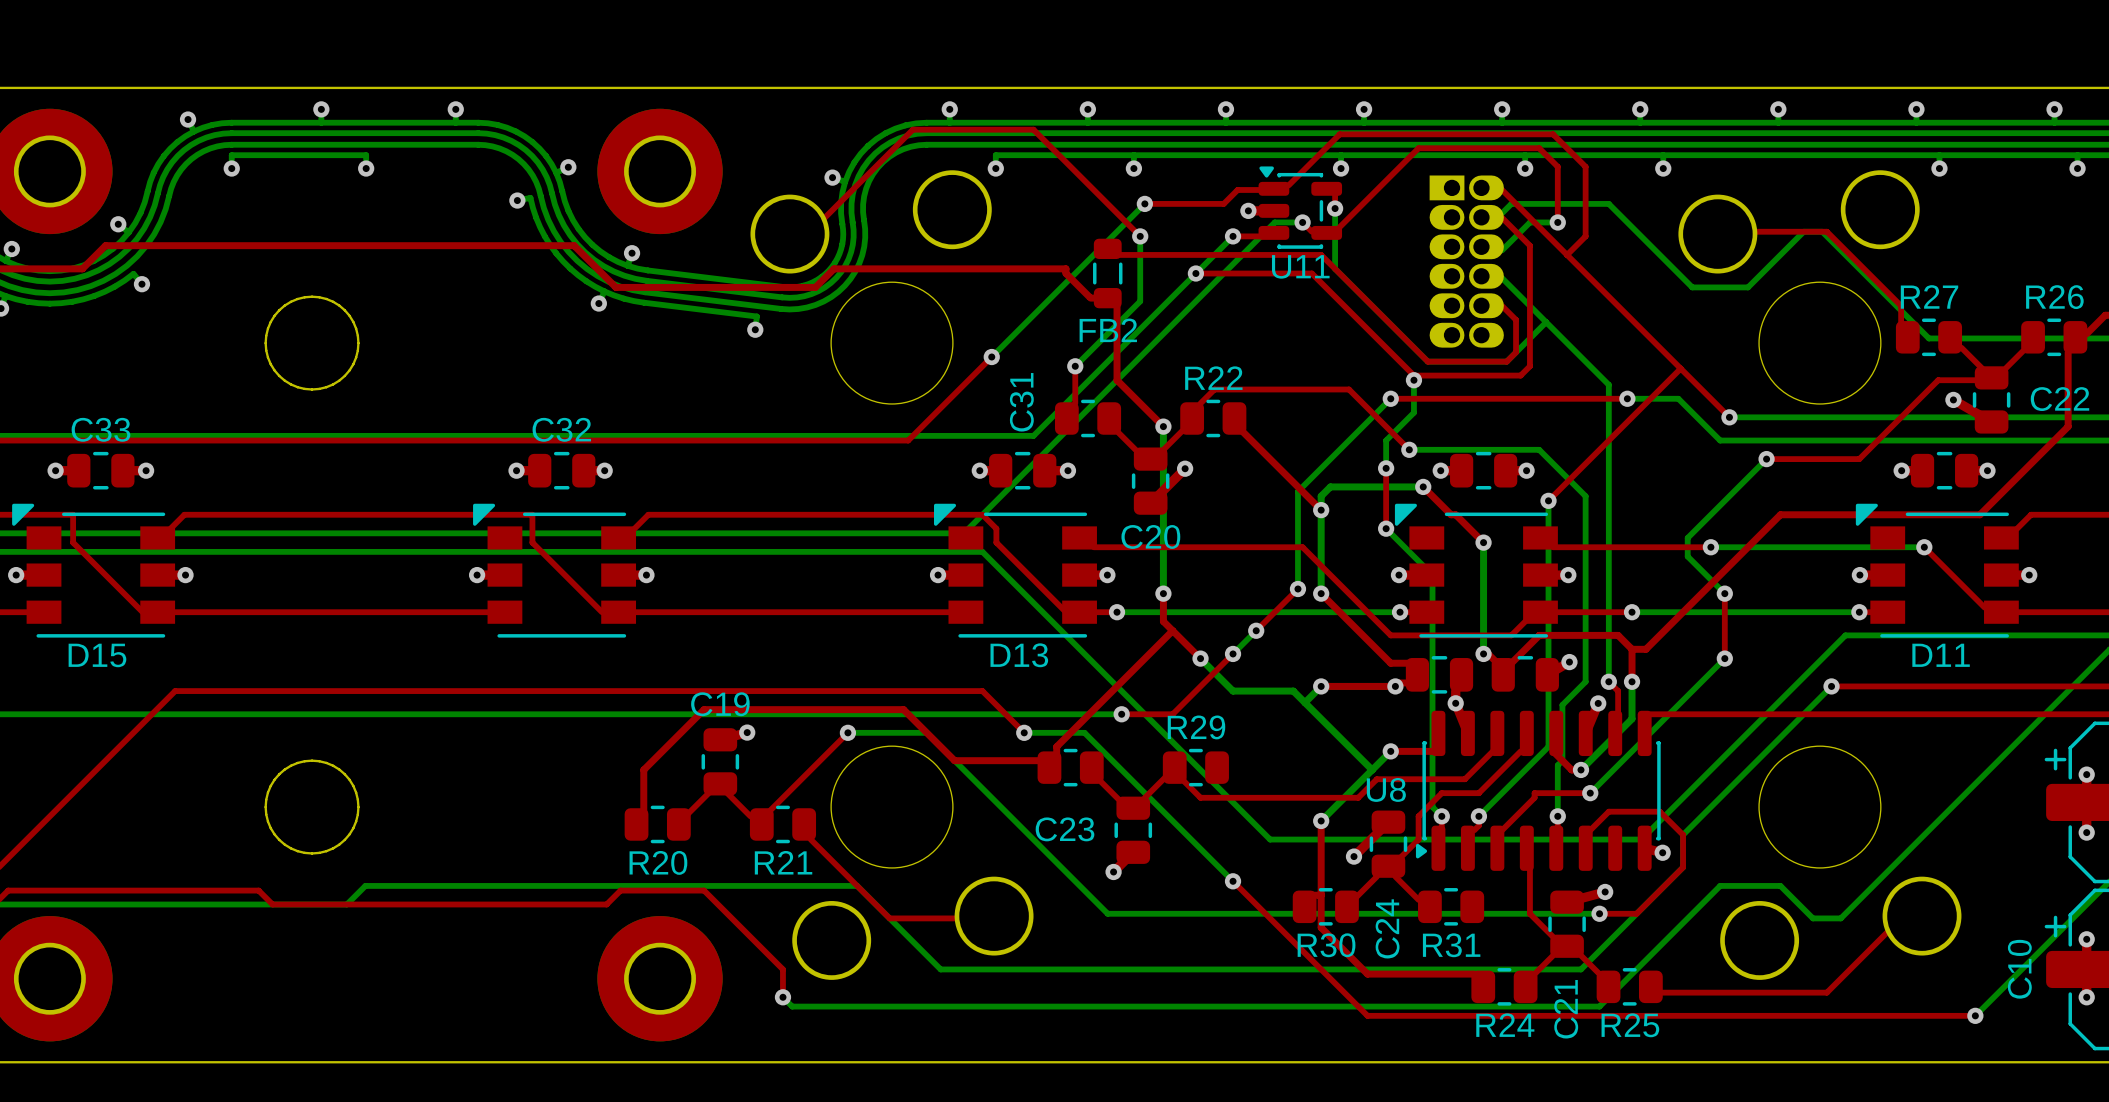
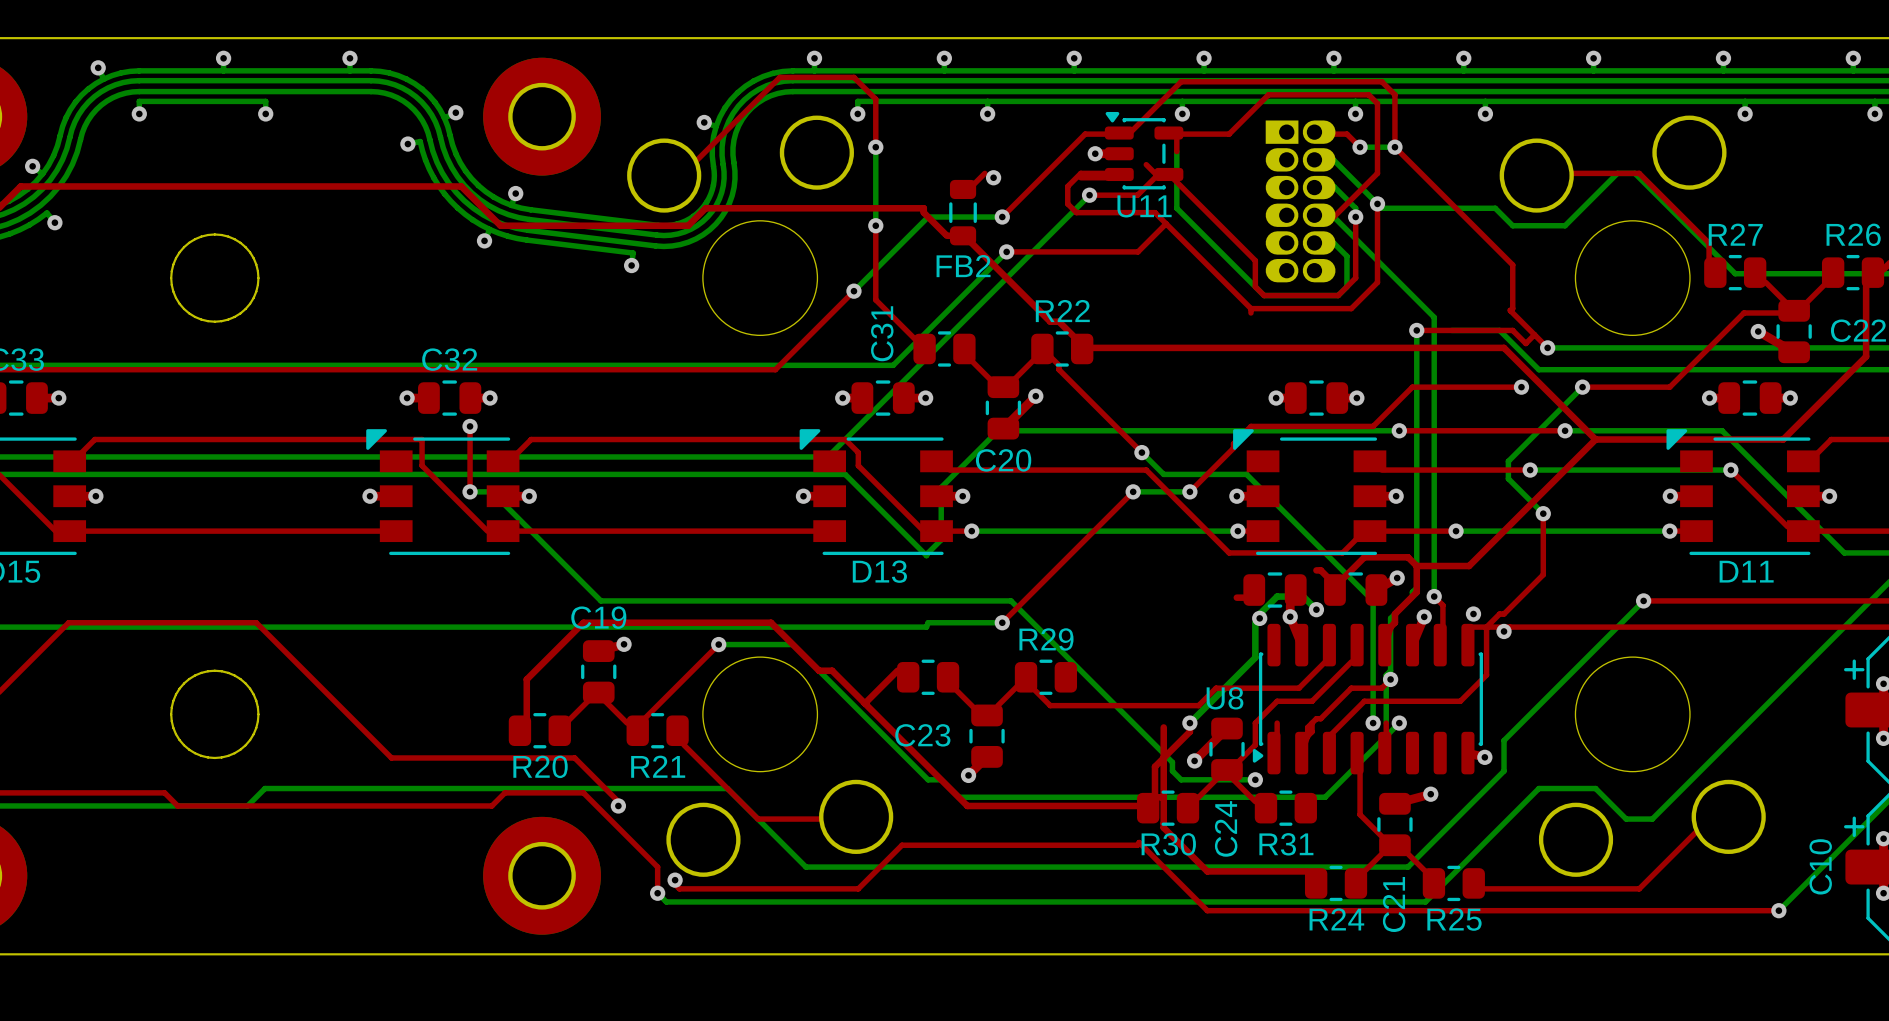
top track: (991, 129) (1033, 129) (1140, 236) -> (853, 77) (875, 99) (875, 147)
top track: (1432, 148) (1418, 148) (1339, 227) -> (1268, 94) (1229, 134) (1168, 133)
top track: (1567, 148) (1585, 166) (1585, 236) (1567, 254) -> (1394, 94) (1394, 147)
top track: (1548, 157) (1557, 166) (1557, 222) -> (1377, 103) (1377, 173) (1333, 217) (1314, 215)
top track: none -> (1314, 132) (1316, 134) (1346, 134) (1360, 147)
top track: (1502, 189) (1689, 377) -> (1399, 151) (1512, 265) (1512, 308) (1510, 310)
bottom track: none -> (875, 147) (875, 225)
via: none -> (875, 147)
top track: (1144, 203) (1223, 203) -> (1002, 217) (1072, 147)
bottom track: (1144, 203) (1070, 278) -> (1002, 217) (928, 217)
via: (1144, 203) -> none
bottom track: (1529, 203) (1511, 203) (1502, 213) -> none
via: none -> (1360, 147)
bottom track: (1567, 203) (1608, 203) (1673, 268) -> (1381, 208) (1495, 208)
via: none -> (1394, 147)
via: (1335, 208) -> none
bottom track: none -> (1314, 159) (1333, 160) (1377, 203)
top track: (1502, 217) (1529, 245) (1529, 366) -> (1377, 203) (1377, 282) (1360, 299)
bottom track: (1302, 222) (1274, 222) (1242, 254) -> none
via: (1302, 222) -> none
bottom track: (1557, 222) (1529, 222) (1502, 250) -> none
via: (1557, 222) -> none
top track: none -> (984, 173) (971, 186) (963, 189)
top track: none -> (1168, 173) (1159, 173) (1137, 195)
bottom track: (1140, 236) (1140, 301) (1075, 366) -> none
bottom track: (1233, 236) (1200, 268) -> none
via position: (1233, 236) -> (1089, 195)
bottom track: none -> (1314, 187) (1333, 186) (1355, 208) (1355, 217)
top track: (1117, 254) (1242, 254) -> none
top track: (1293, 254) (1321, 254) (1418, 352) -> (1168, 173) (1255, 260) (1255, 286)
via: none -> (1377, 203)
top track: (1195, 273) (1228, 273) -> (1119, 174) (1080, 173) (1067, 186) (1067, 203) (1076, 212)
bottom track: (1195, 273) (1154, 315) -> none
via: (1195, 273) -> none
via: none -> (1002, 217)
via: none -> (1355, 217)
top track: none -> (1166, 223) (1137, 251) (1006, 251)
top track: none -> (875, 225) (875, 299) (924, 348)
via: none -> (875, 225)
top track: none -> (963, 235) (1050, 321) (1059, 321) (1076, 339) (1082, 348) (1080, 347) (1504, 347) (1595, 439)
top track: (1117, 305) (1117, 380) (1163, 426) -> none
top track: (1502, 305) (1516, 319) (1516, 352) -> (1355, 217) (1355, 278) (1346, 286)
via: none -> (1006, 251)
bottom track: (1546, 322) (1516, 352) -> (1314, 242) (1333, 243) (1346, 256) (1346, 286)
top track: (1075, 366) (1075, 403) -> none
via: (1075, 366) -> none
top track: (1680, 368) (1548, 500) -> none
bottom track: (1413, 380) (1413, 412) (1386, 440) (1386, 468) -> none
via: (1413, 380) -> none
top track: (1390, 398) (1590, 398) -> none
bottom track: (1390, 398) (1297, 491) (1297, 589) -> none
via: (1390, 398) -> none
top track: none -> (1451, 330) (1512, 330) (1525, 343) (1534, 334)
via position: (1627, 398) -> (1416, 330)
top track: (1200, 403) (1214, 389) (1349, 389) (1409, 449) -> none
top track: none -> (1042, 348) (1059, 365) (1059, 369) (1141, 452)
bottom track: (1163, 426) (1163, 593) -> none
via: (1163, 426) -> none
top track: (1242, 431) (1321, 510) -> none
bottom track: (1409, 449) (1539, 449) (1585, 496) (1585, 677) -> (1416, 330) (1416, 587) (1412, 592)
via: (1409, 449) -> none
top track: none -> (1521, 387) (1412, 387) (1373, 426) (1250, 426) (1233, 443) (1233, 448) (1189, 491)
via: none -> (1521, 387)
top track: (1386, 468) (1386, 528) -> none
via: (1386, 468) -> none
top track: (1423, 486) (1451, 514) (1455, 514) (1483, 542) -> none
bottom track: (1423, 486) (1330, 486) (1321, 496) (1321, 593) -> none
via: (1423, 486) -> none
top track: none -> (470, 426) (470, 491)
via: none -> (470, 426)
bottom track: (1548, 500) (1548, 746) (1478, 816) -> none
via position: (1548, 500) -> (1399, 430)
top track: none -> (1399, 430) (1565, 430)
bottom track: none -> (1565, 430) (1722, 430) (1844, 552)
via: none -> (1565, 430)
via position: (1321, 510) -> (1141, 452)
bottom track: (1386, 528) (1409, 551) -> (1141, 452) (1163, 474) (1246, 474)
via: (1386, 528) -> none
bottom track: (1483, 542) (1483, 653) -> none
via: (1483, 542) -> none
bottom track: none -> (470, 491) (491, 491) (600, 600) (1011, 600) (1172, 762) (1172, 771) (1181, 779) (1255, 779)
via: none -> (470, 491)
top track: none -> (1133, 491) (1002, 622)
bottom track: none -> (1133, 491) (1189, 491)
via: none -> (1133, 491)
via: none -> (1189, 491)
bottom track: (1432, 575) (1432, 807) (1441, 816) -> (1268, 496) (1373, 600) (1373, 723)
top track: (1297, 589) (1256, 630) -> none
via: (1297, 589) -> none
top track: (1163, 593) (1163, 621) (1200, 658) -> none
via: (1163, 593) -> none
top track: (1321, 593) (1390, 663) (1409, 663) -> none
via: (1321, 593) -> none
top track: (1172, 630) (1056, 746) (1056, 756) -> none
bottom track: (1256, 630) (1233, 653) -> none
via: (1256, 630) -> none
bottom track: (2044, 635) (1845, 635) (1641, 839) (1270, 839) (1068, 638) -> (1399, 430) (997, 430) (941, 487) (941, 539) (926, 555)
top track: (1534, 640) (1539, 635) (1618, 635) (1632, 649) (1632, 681) -> (1364, 557) (1408, 557) (1416, 566)
top track: none -> (1416, 566) (1416, 592) (1394, 614) (1394, 622) (1390, 627) (1384, 645)
top track: (1233, 653) (1172, 714) (1121, 714) -> none
via: (1233, 653) -> none
via: (1483, 653) -> none
bottom track: (1200, 658) (1233, 691) (1293, 691) (1372, 769) -> none
via: (1200, 658) -> none
top track: none -> (1543, 574) (1504, 614) (1499, 614) (1486, 627) (1486, 675) (1460, 701) (1416, 701)
bottom track: (1724, 658) (1590, 793) -> none
via: (1724, 658) -> none
bottom track: (1632, 681) (1632, 718) (1580, 769) -> none
via position: (1632, 681) -> (1473, 614)
top track: (1321, 686) (1395, 686) -> none
via: (1321, 686) -> none
via: (1395, 686) -> none
bottom track: (1316, 691) (1304, 702) -> none
bottom track: none -> (1316, 609) (1303, 596) (1277, 596) (1259, 614) (1259, 618)
via: none -> (1316, 609)
via: none -> (1259, 618)
top track: (156, 709) (175, 691) (982, 691) (1024, 732) -> (68, 622) (256, 622) (391, 757) (574, 757) (618, 801) (618, 805)
bottom track: none -> (1255, 622) (1255, 657) (1189, 723)
bottom track: (1068, 714) (1121, 714) -> (926, 627) (928, 622) (1002, 622)
via position: (1121, 714) -> (1002, 622)
via: none -> (1504, 631)
bottom track: (1024, 732) (1084, 732) (1233, 881) -> none
via: (1024, 732) -> none
top track: (1390, 751) (1432, 751) -> (1416, 566) (1456, 566)
bottom track: (1390, 751) (1321, 820) -> none
via: (1390, 751) -> none
top track: (1553, 751) (1571, 769) (1580, 769) -> none
top track: (968, 760) (1038, 760) -> (864, 703) (897, 670)
top track: none -> (832, 670) (967, 805) (1146, 805) (1148, 808) (1155, 797) (1155, 766) (1189, 731) (1189, 723)
top track: none -> (1390, 679) (1381, 688) (1351, 688) (1320, 718) (1316, 718) (1307, 727) (1307, 736) (1301, 753)
via: none -> (1390, 679)
via: (1580, 769) -> none
top track: (1534, 793) (1534, 797) (1502, 830) -> (1364, 701) (1329, 736) (1329, 753)
via: (1590, 793) -> none
via: (1441, 816) -> none
via: (1478, 816) -> none
via: none -> (1373, 723)
via: (1557, 816) -> none
via: none -> (1399, 723)
via position: (1321, 820) -> (1189, 723)
top track: (1590, 830) (1608, 811) (1659, 811) (1683, 834) (1683, 867) (1636, 913) (1599, 913) -> none
bottom track: (1070, 876) (1107, 913) (1599, 913) -> (928, 779) (941, 779) (958, 797) (1325, 797) (1399, 723)
via: none -> (1255, 779)
top track: (1233, 881) (1295, 943) -> (675, 880) (675, 884) (679, 888) (858, 888) (901, 845) (1137, 845) (1139, 842)
via: (1233, 881) -> none
via: none -> (618, 805)
via: (1599, 913) -> none
via: none -> (675, 880)

